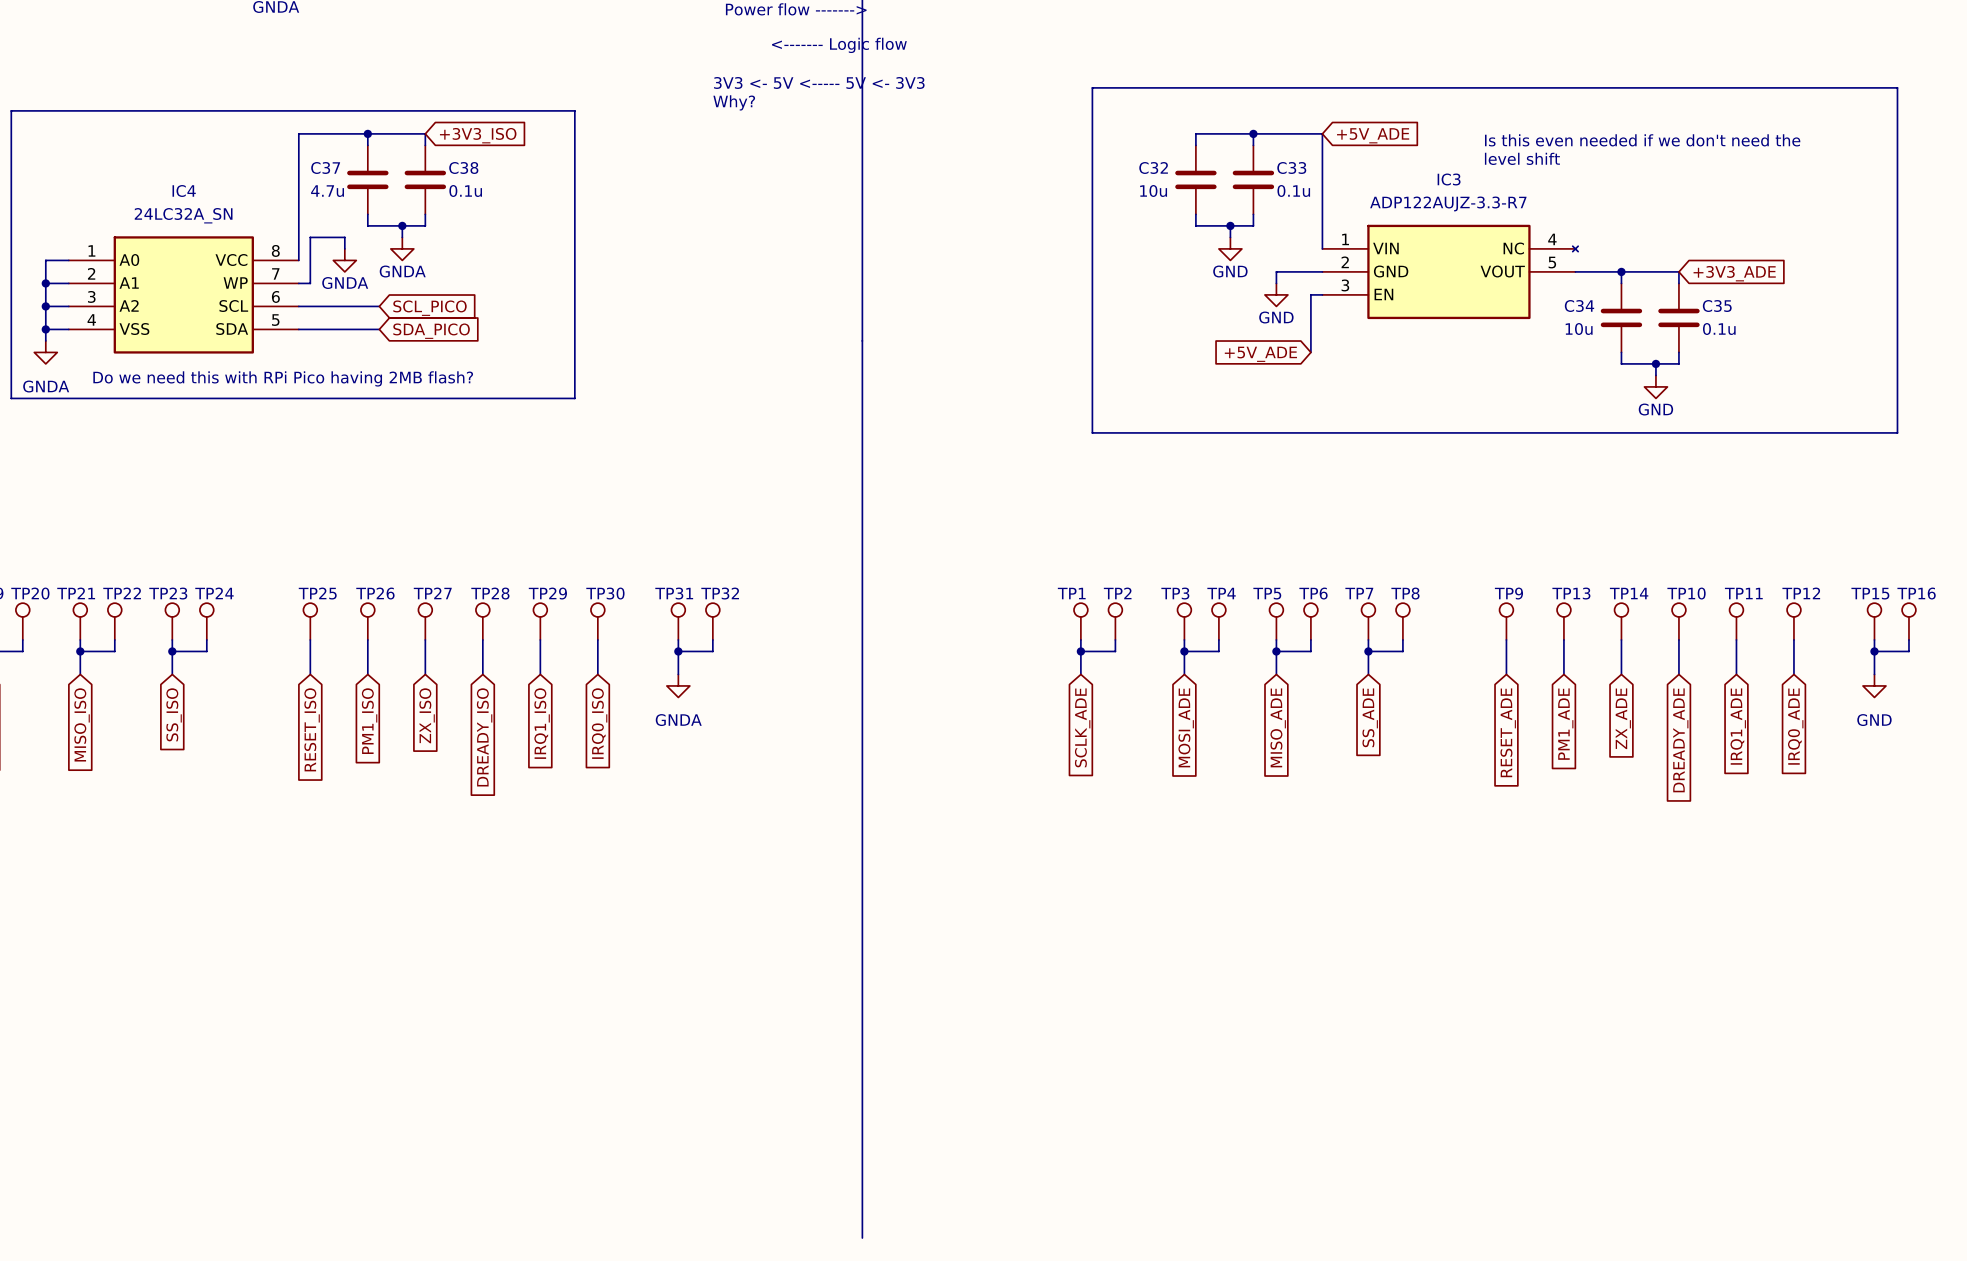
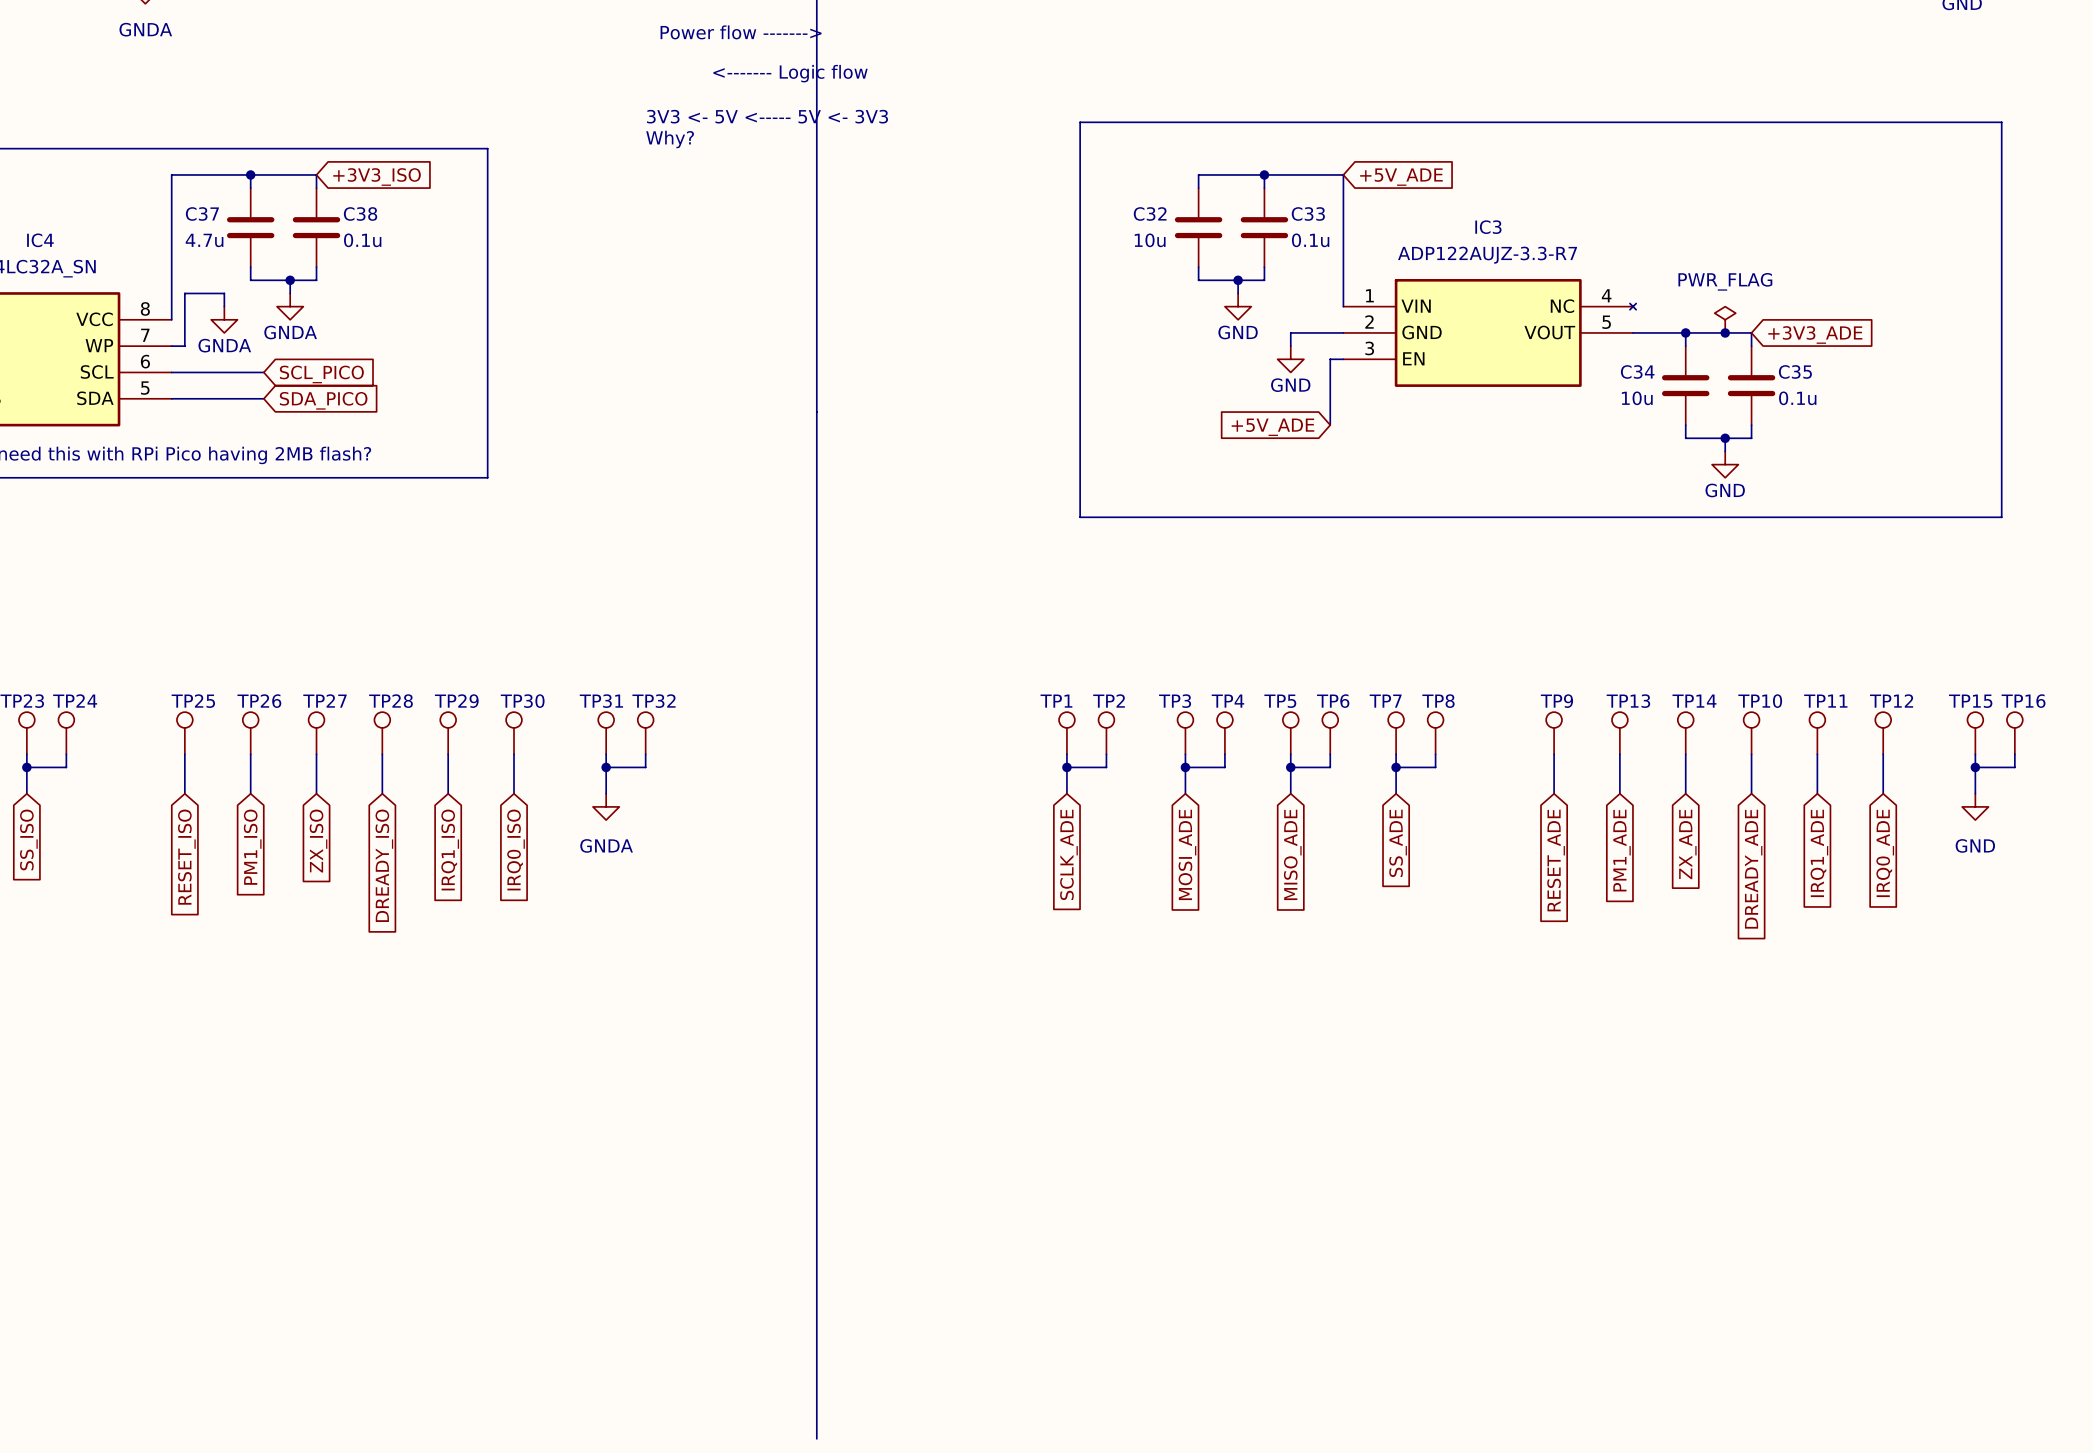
text: Is this even needed if we don't need the (1642, 140) -> none
text: level shift (1522, 158) -> none
power symbol: none -> PWR_FLAG (1725, 319)
junction: none -> (1725, 332)

